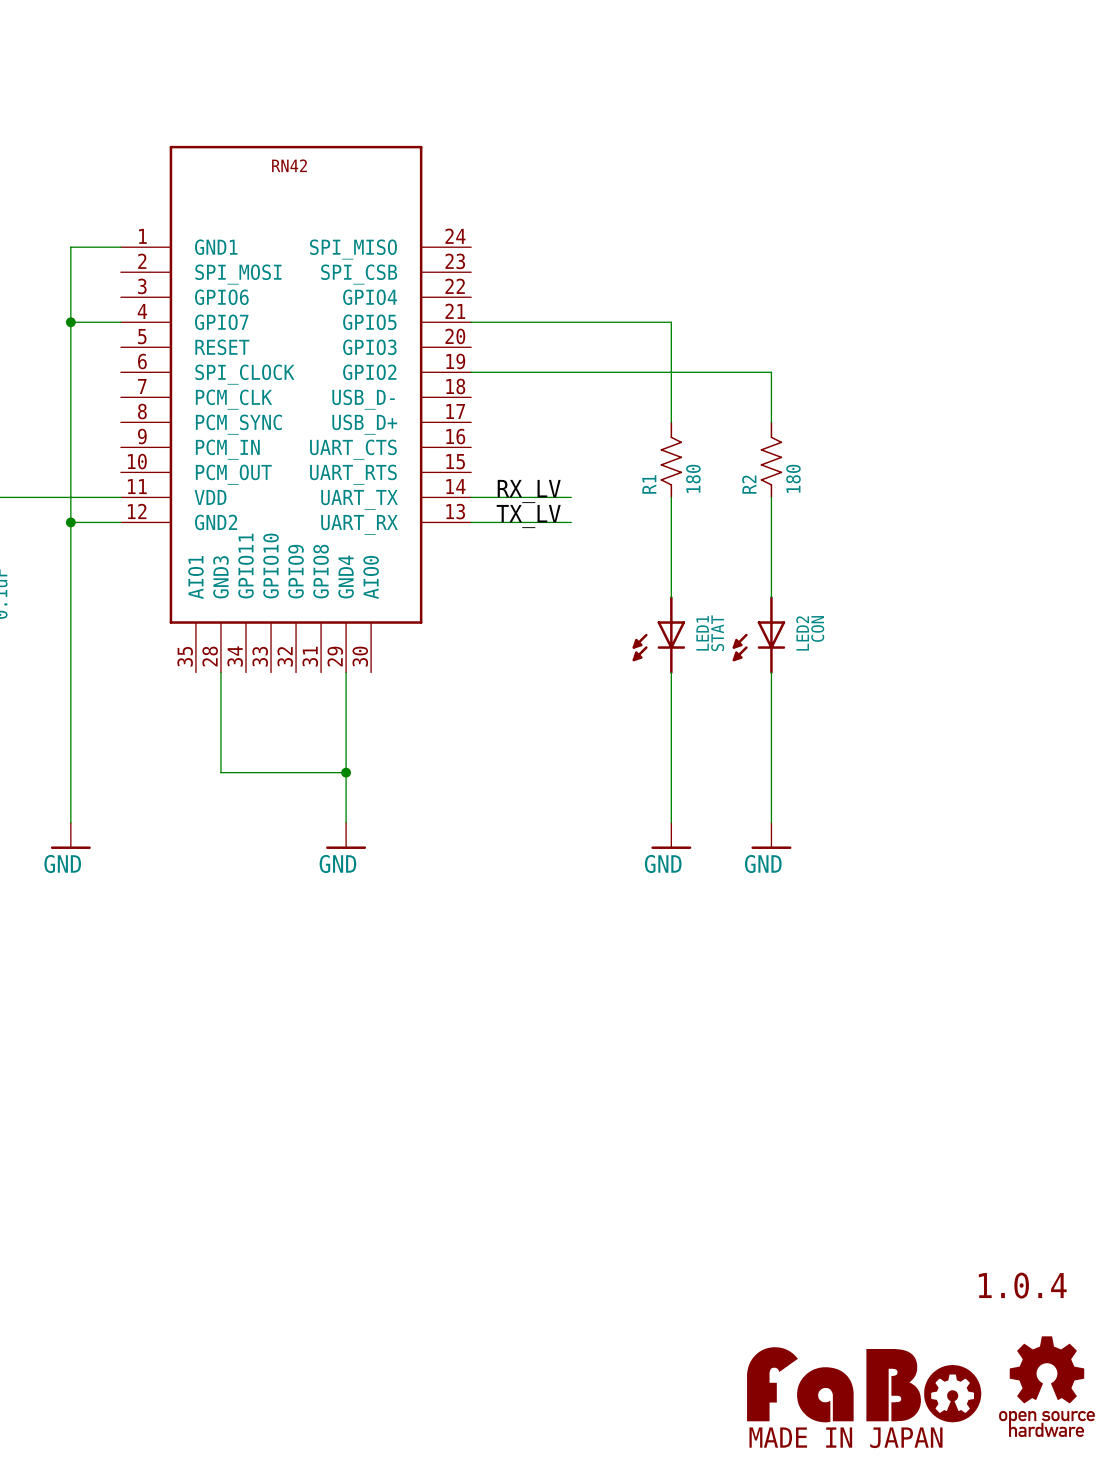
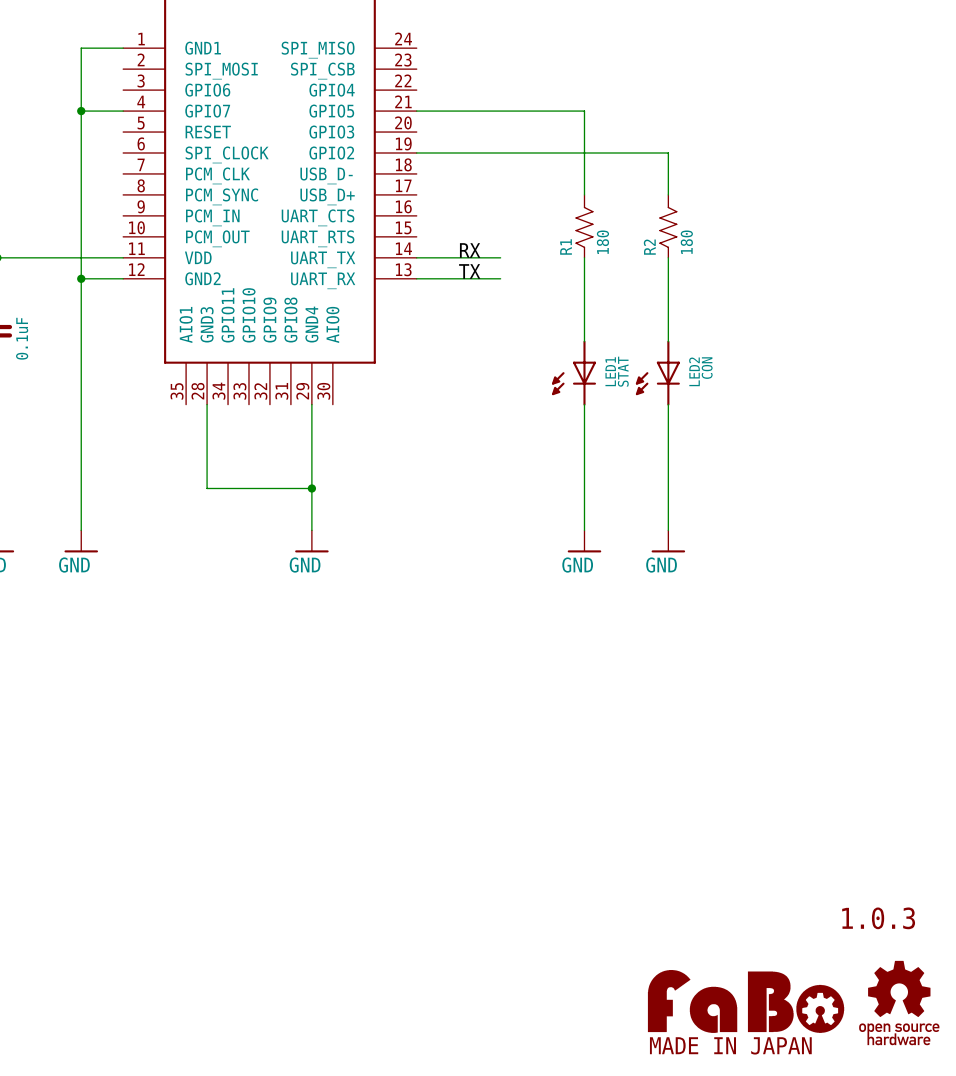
label: none -> RX (470, 250)
label: RX_LV (529, 491) -> none
label: none -> TX (469, 271)
label: TX_LV (528, 516) -> none
text: 1.0.4 (1022, 1285) -> 1.0.3 (878, 918)

